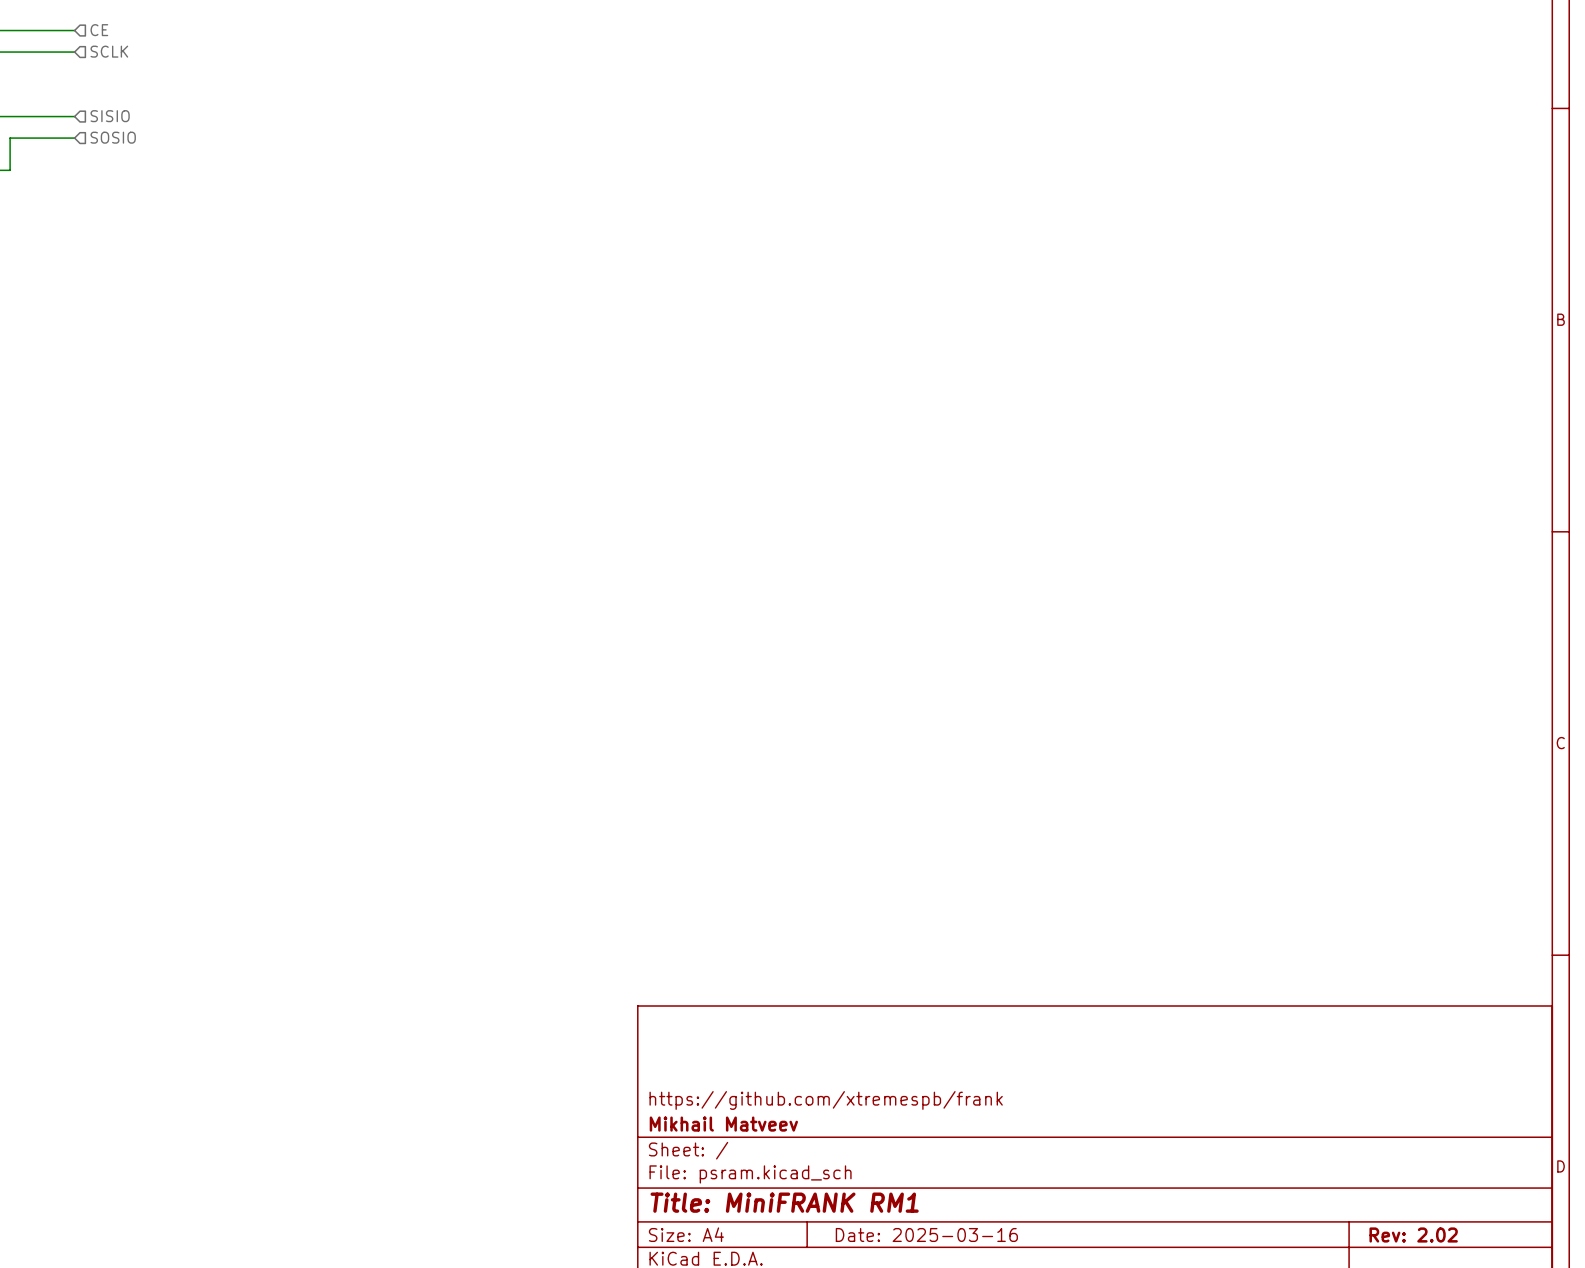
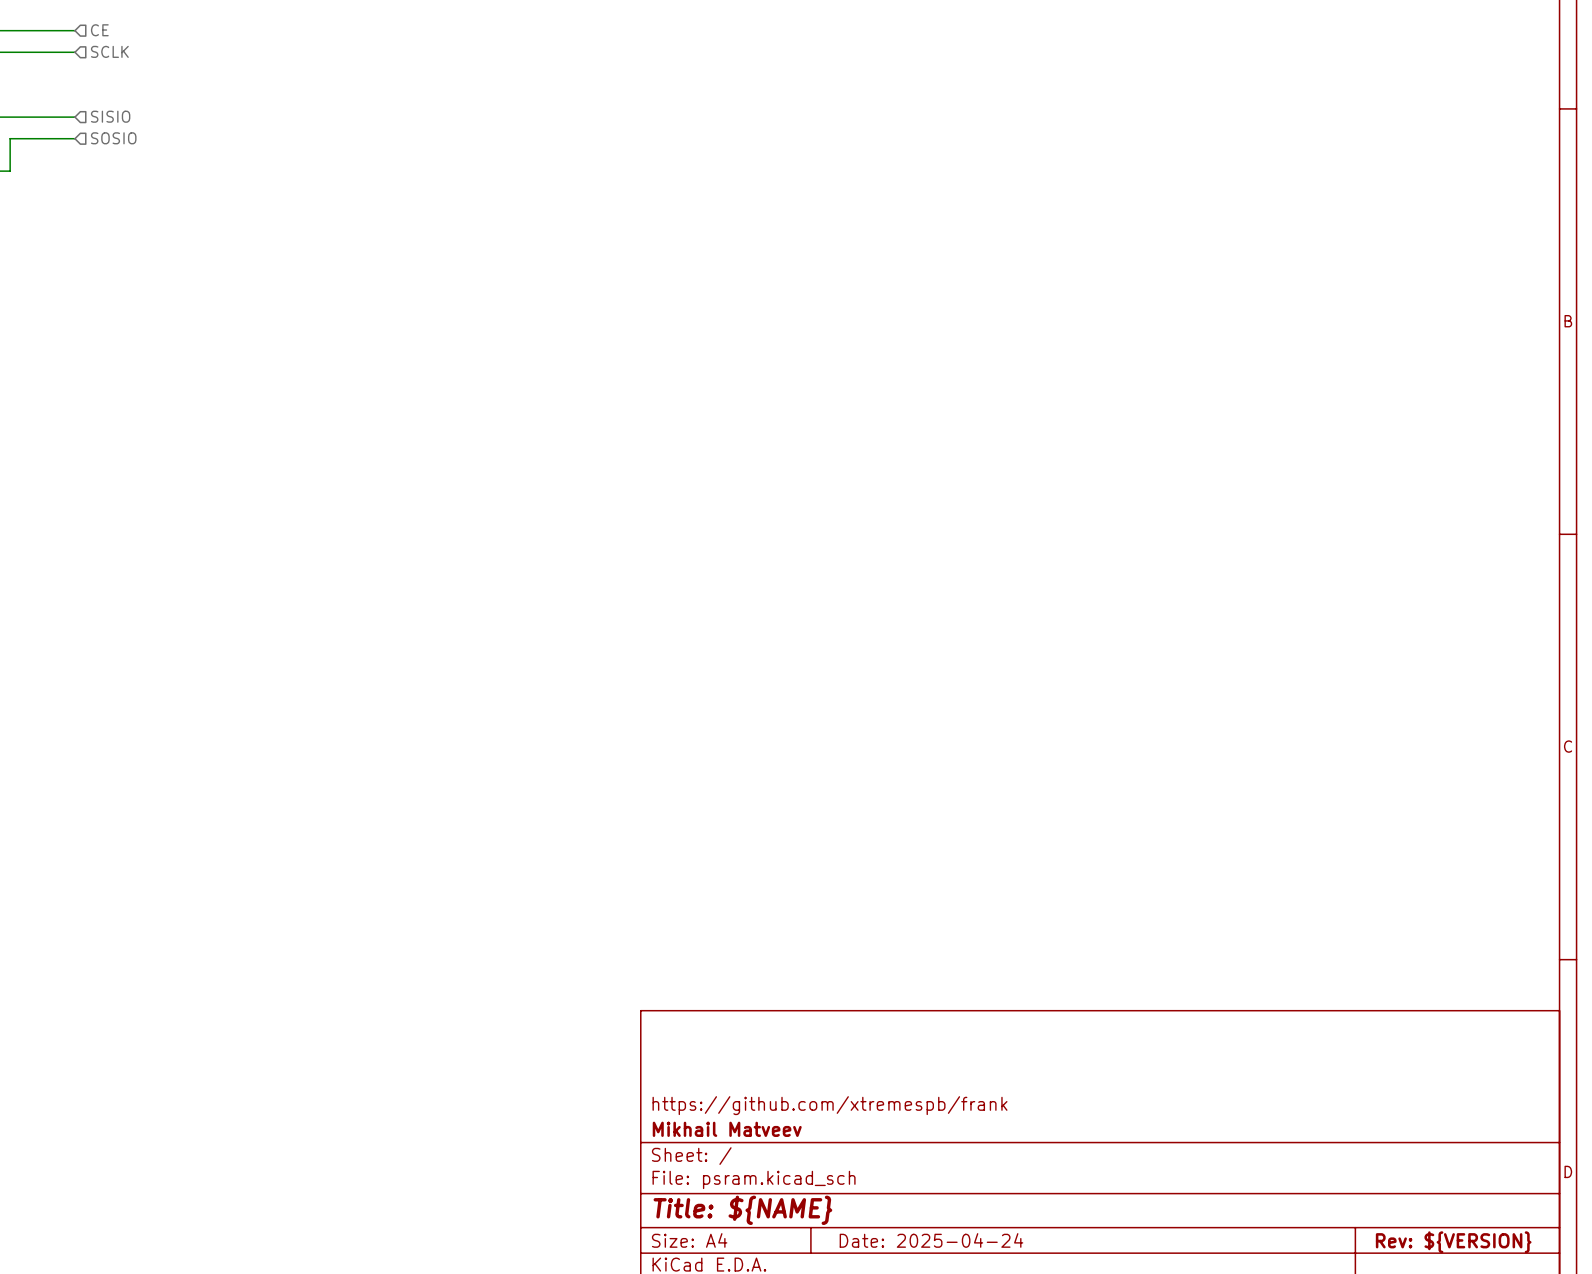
title block: Title: MiniFRANK RM1 (784, 1202) -> Title: ${NAME} (742, 1210)
title block: Date: 2025-03-16 (926, 1234) -> Date: 2025-04-24 (931, 1240)
title block: Rev: 2.02 (1413, 1234) -> Rev: ${VERSION} (1453, 1242)

